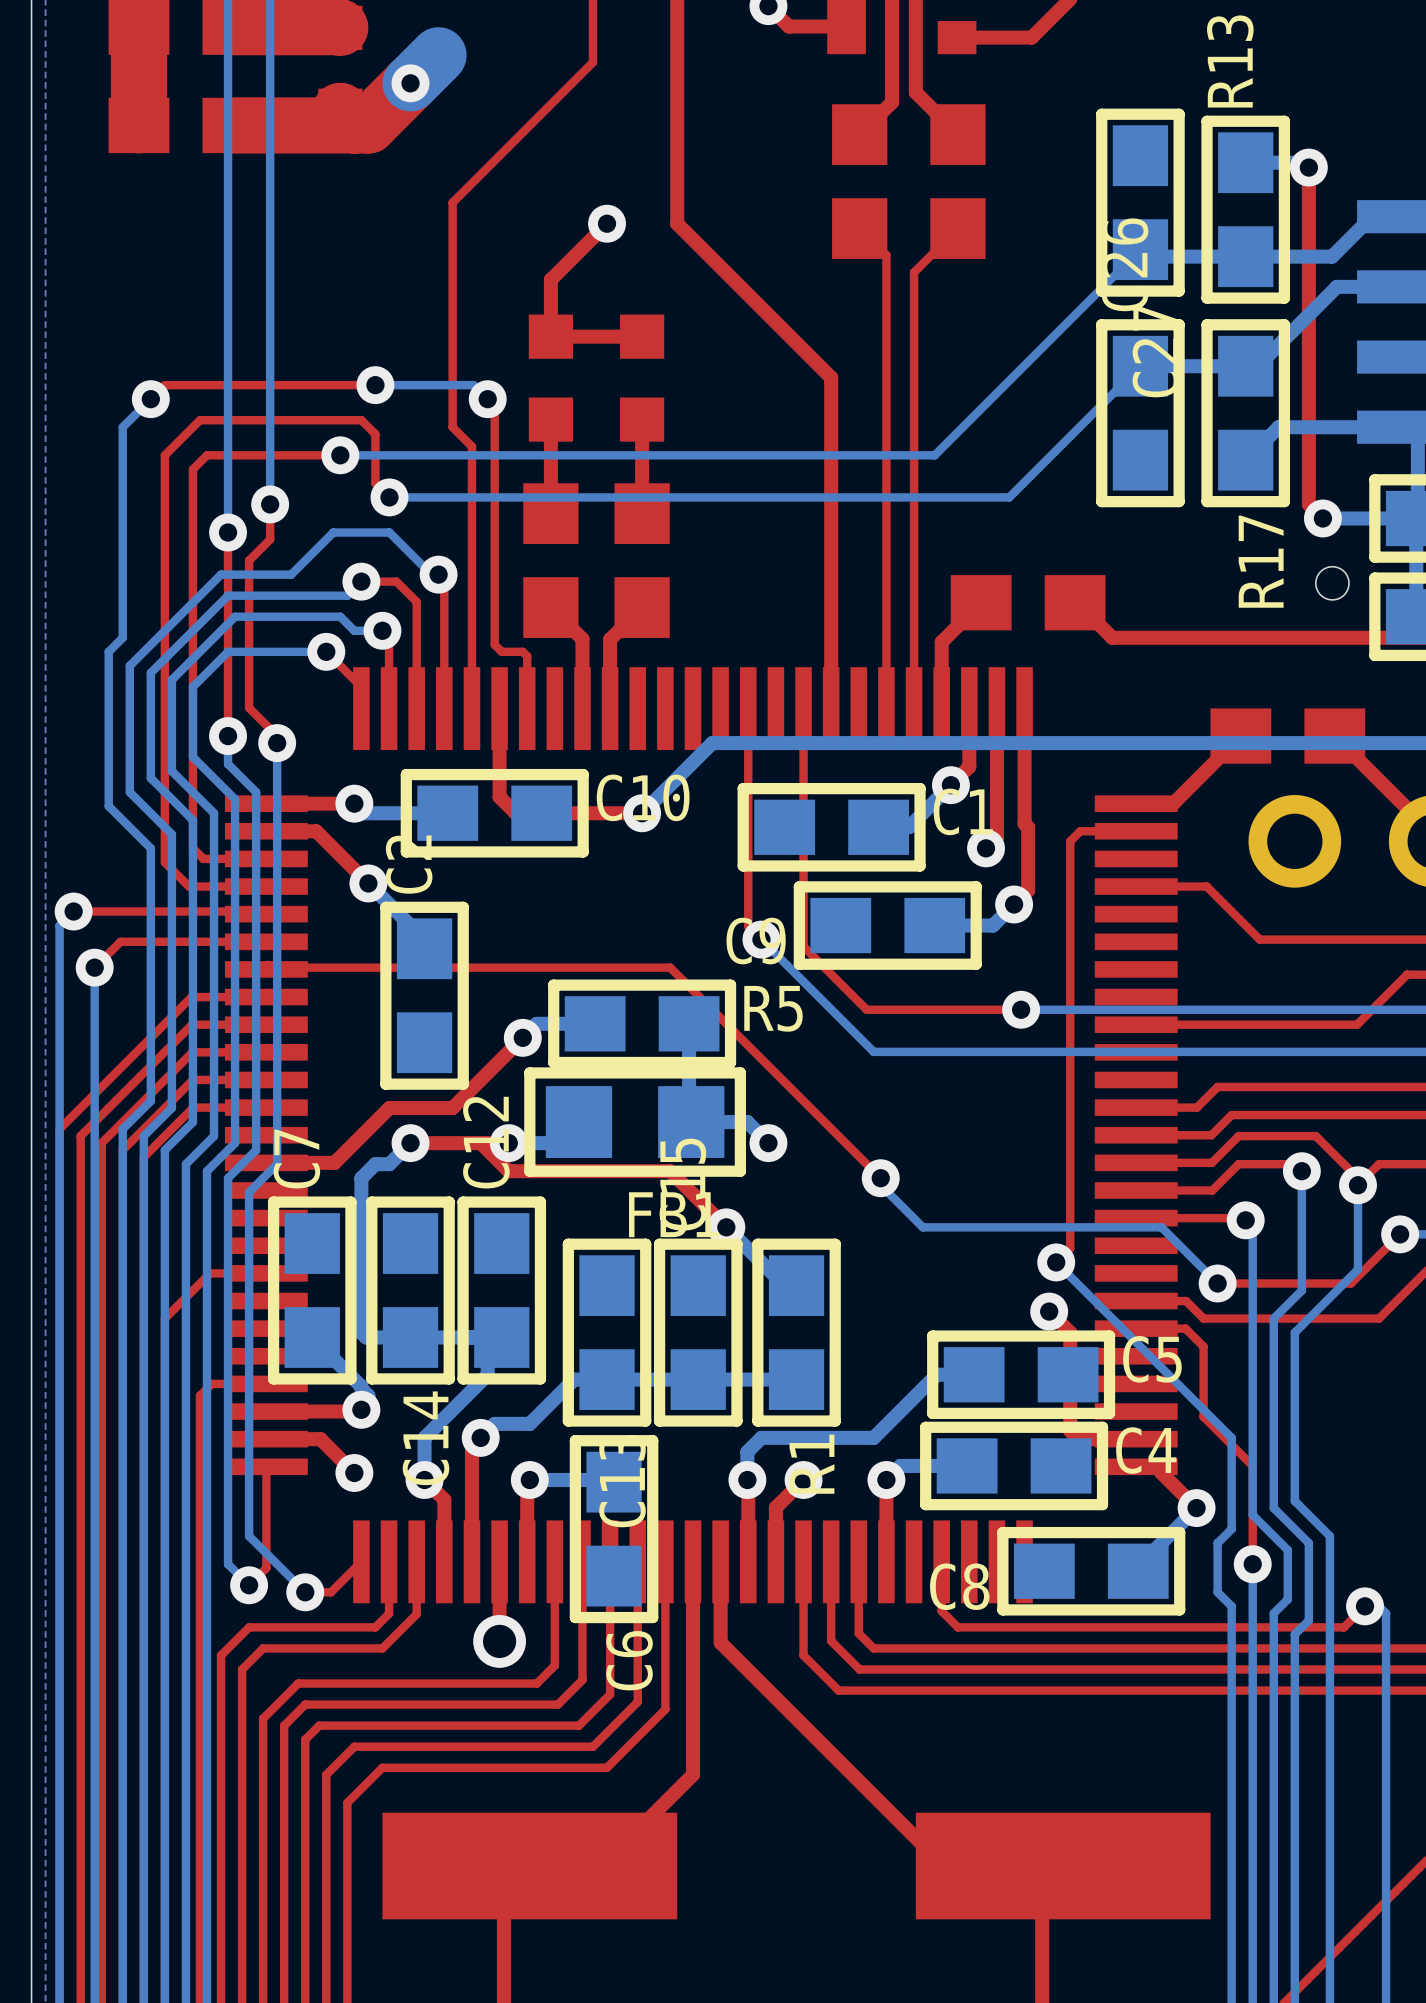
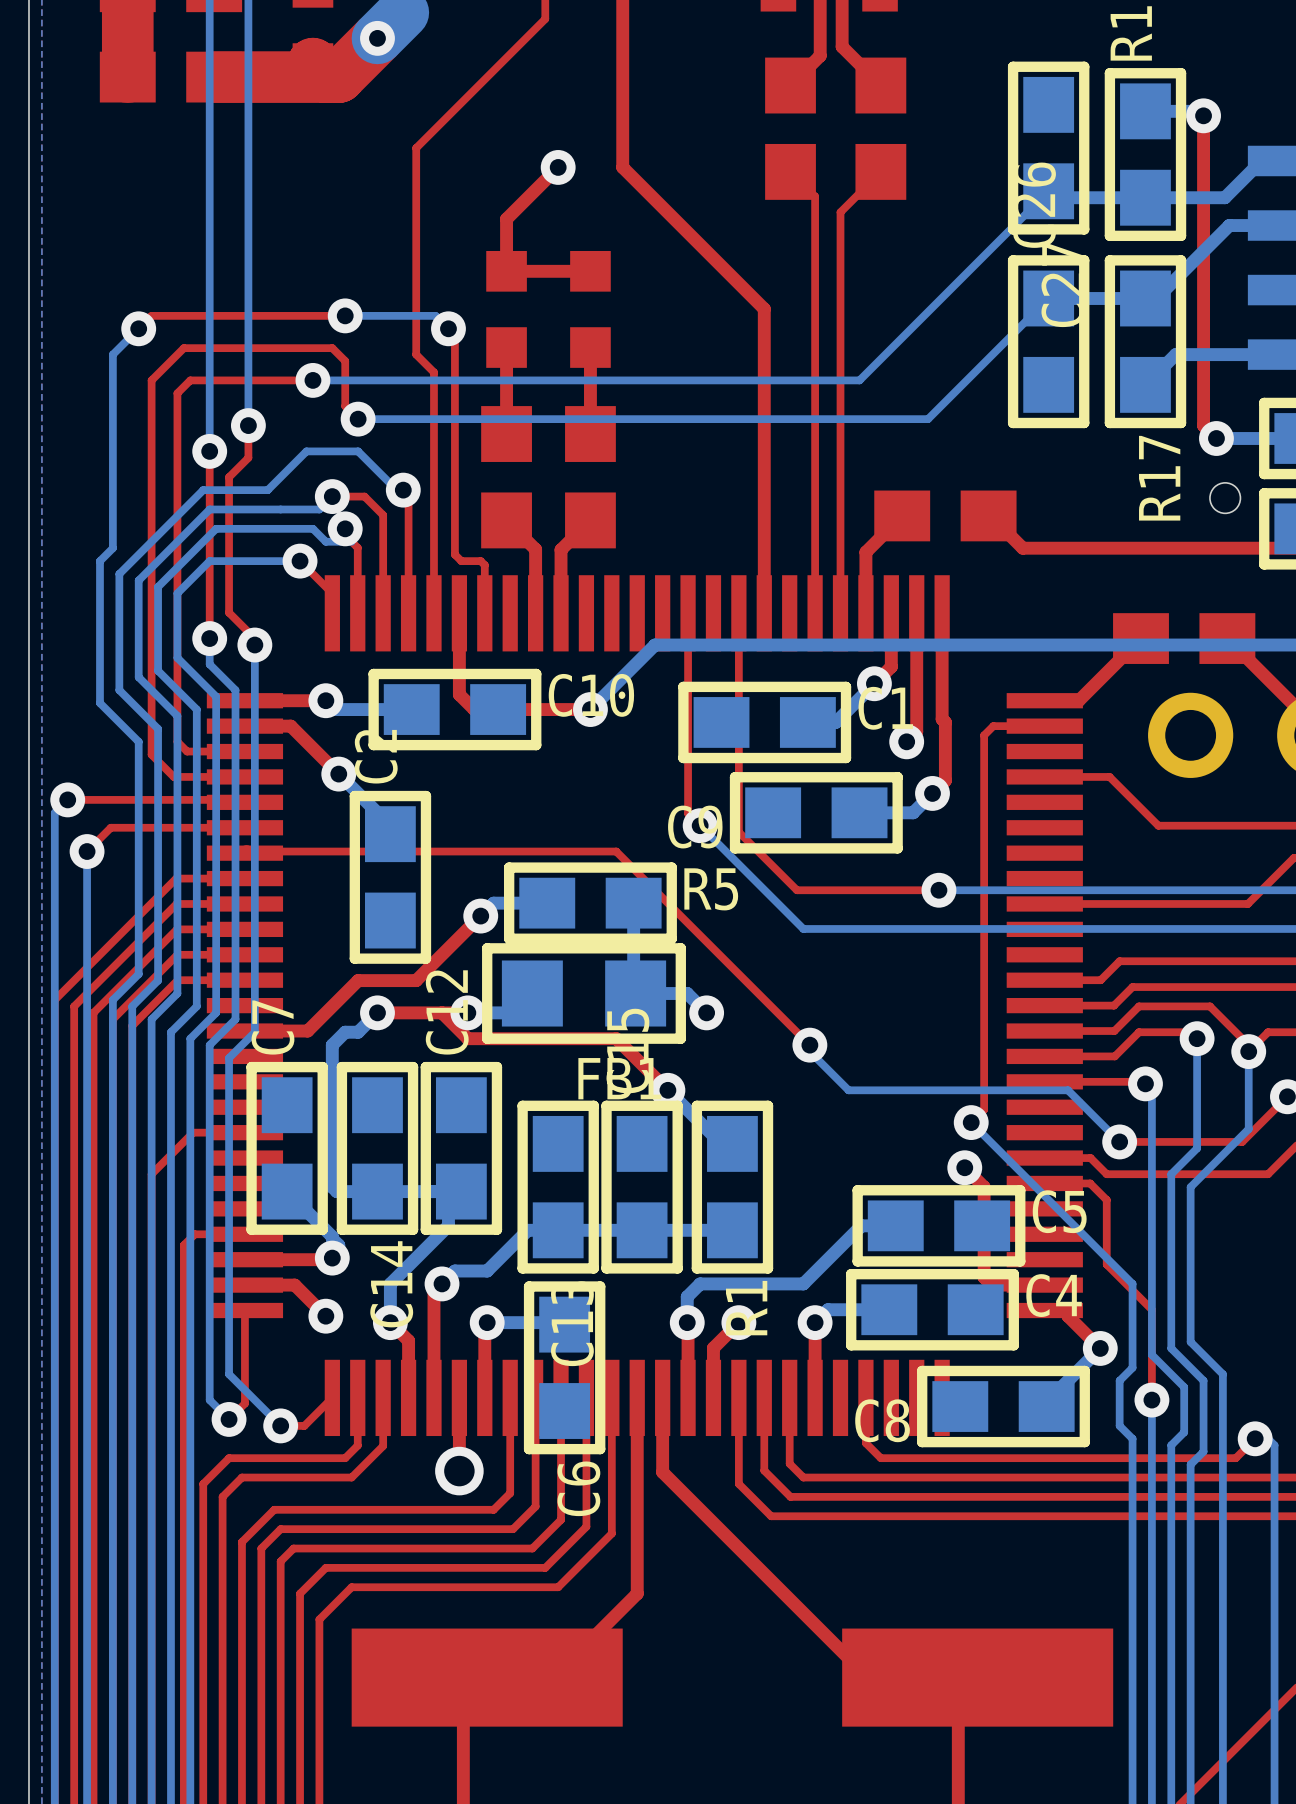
via position: (382, 630) -> (345, 528)

